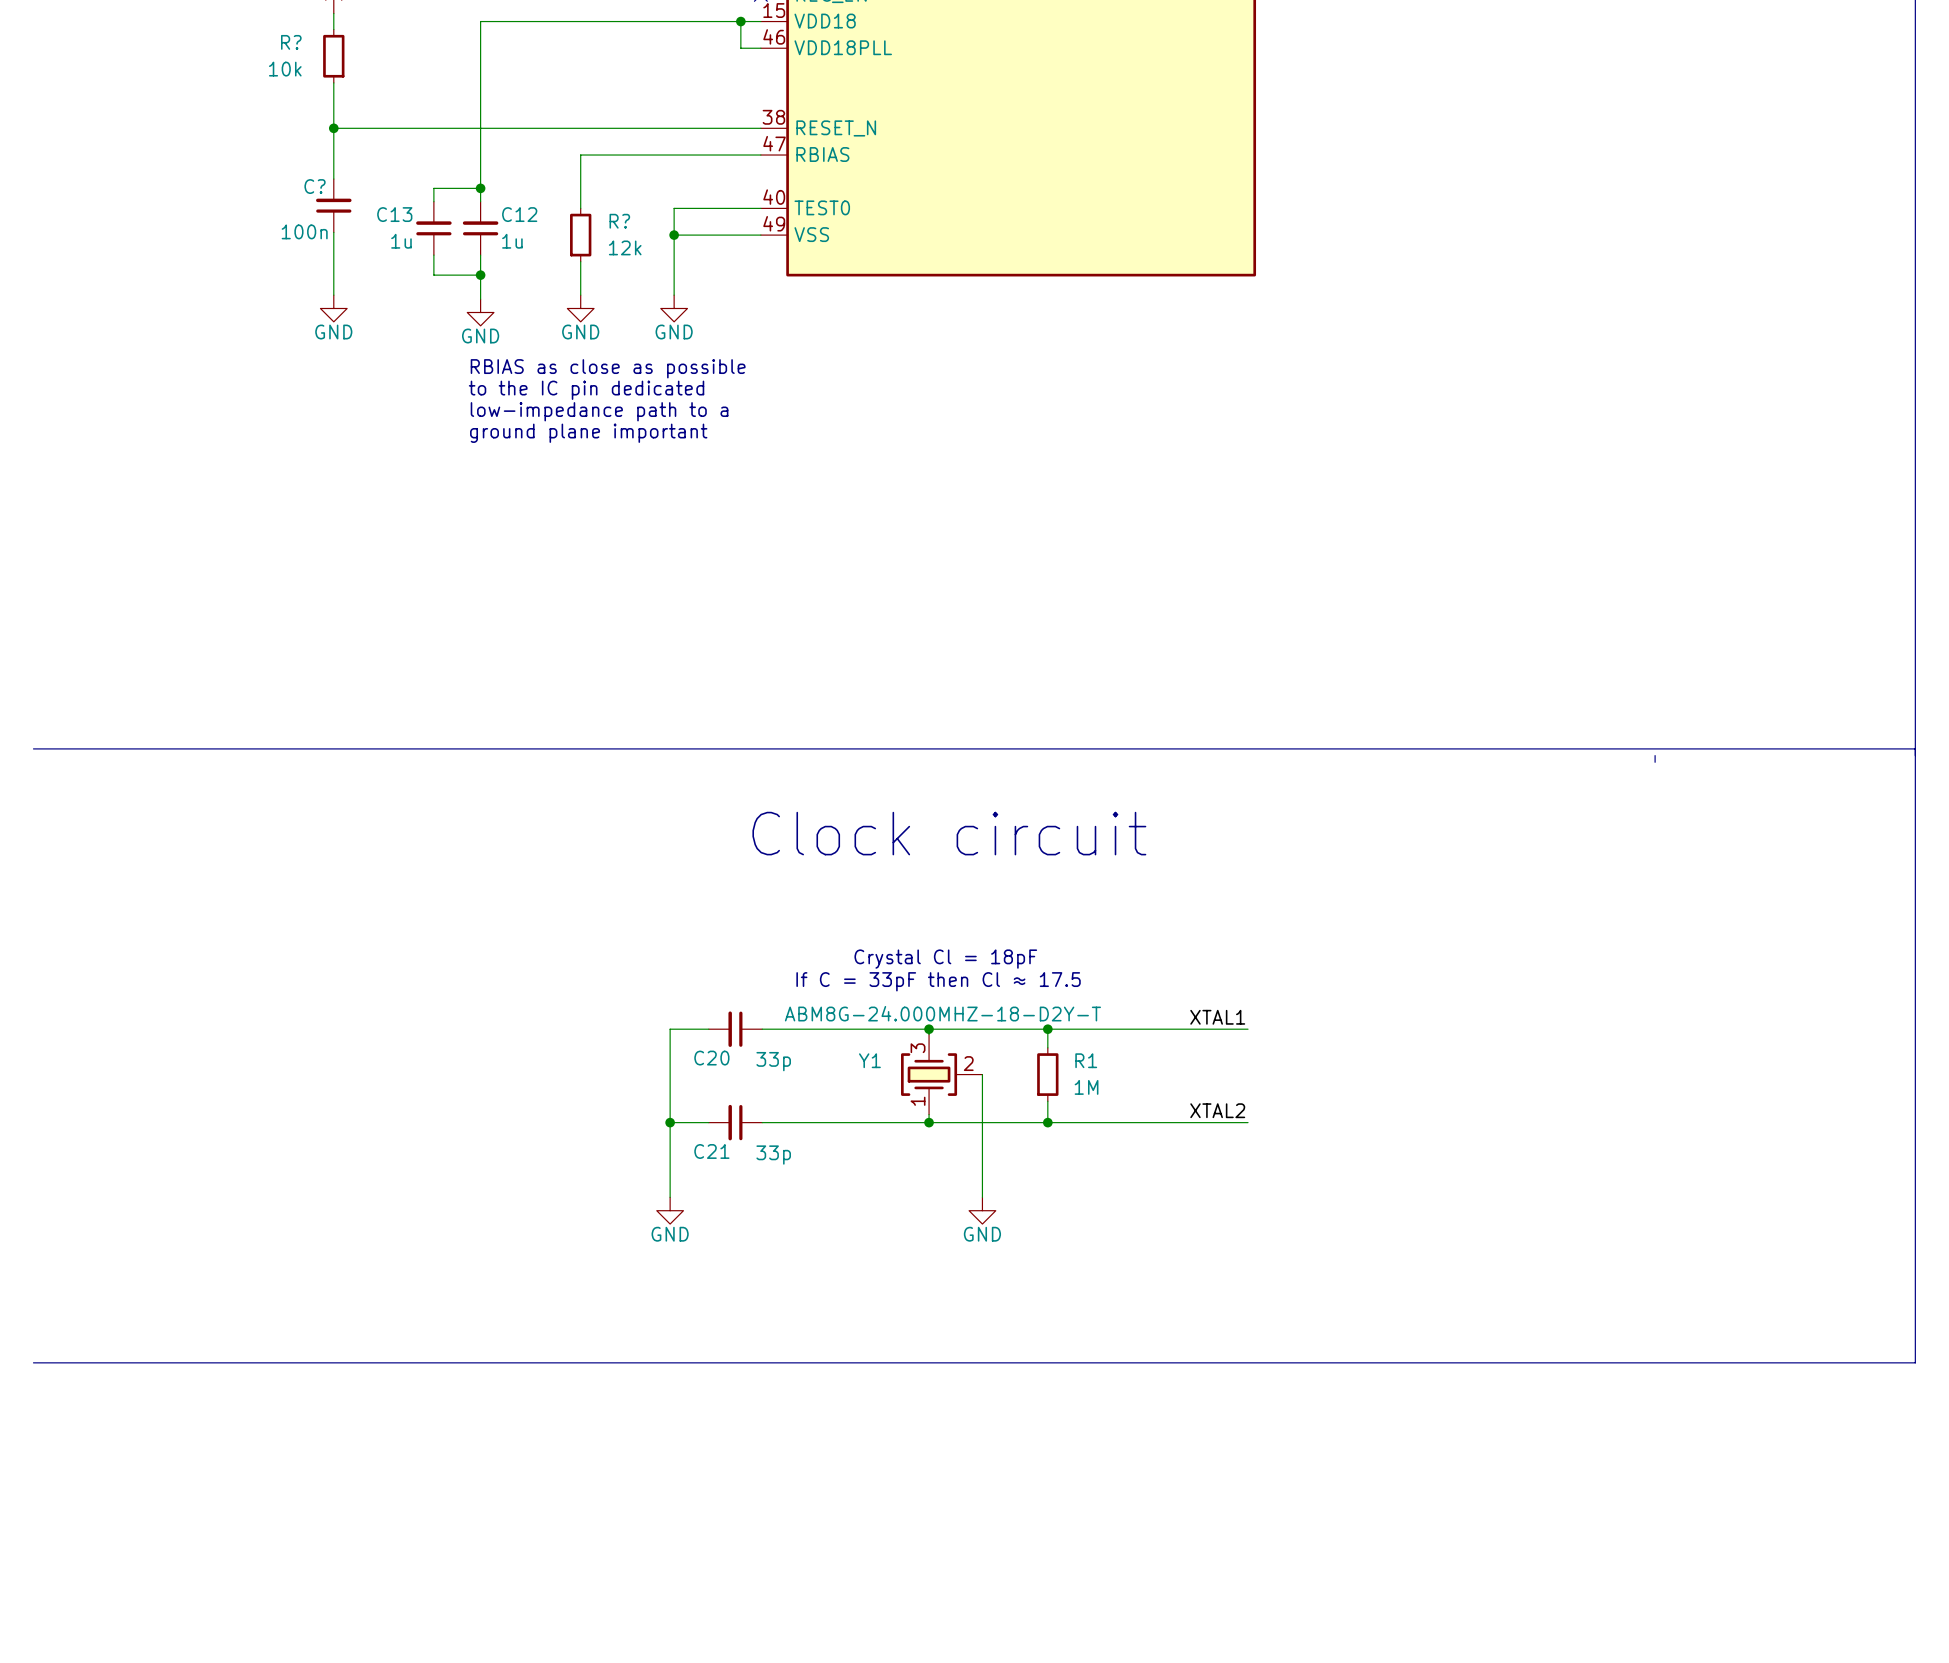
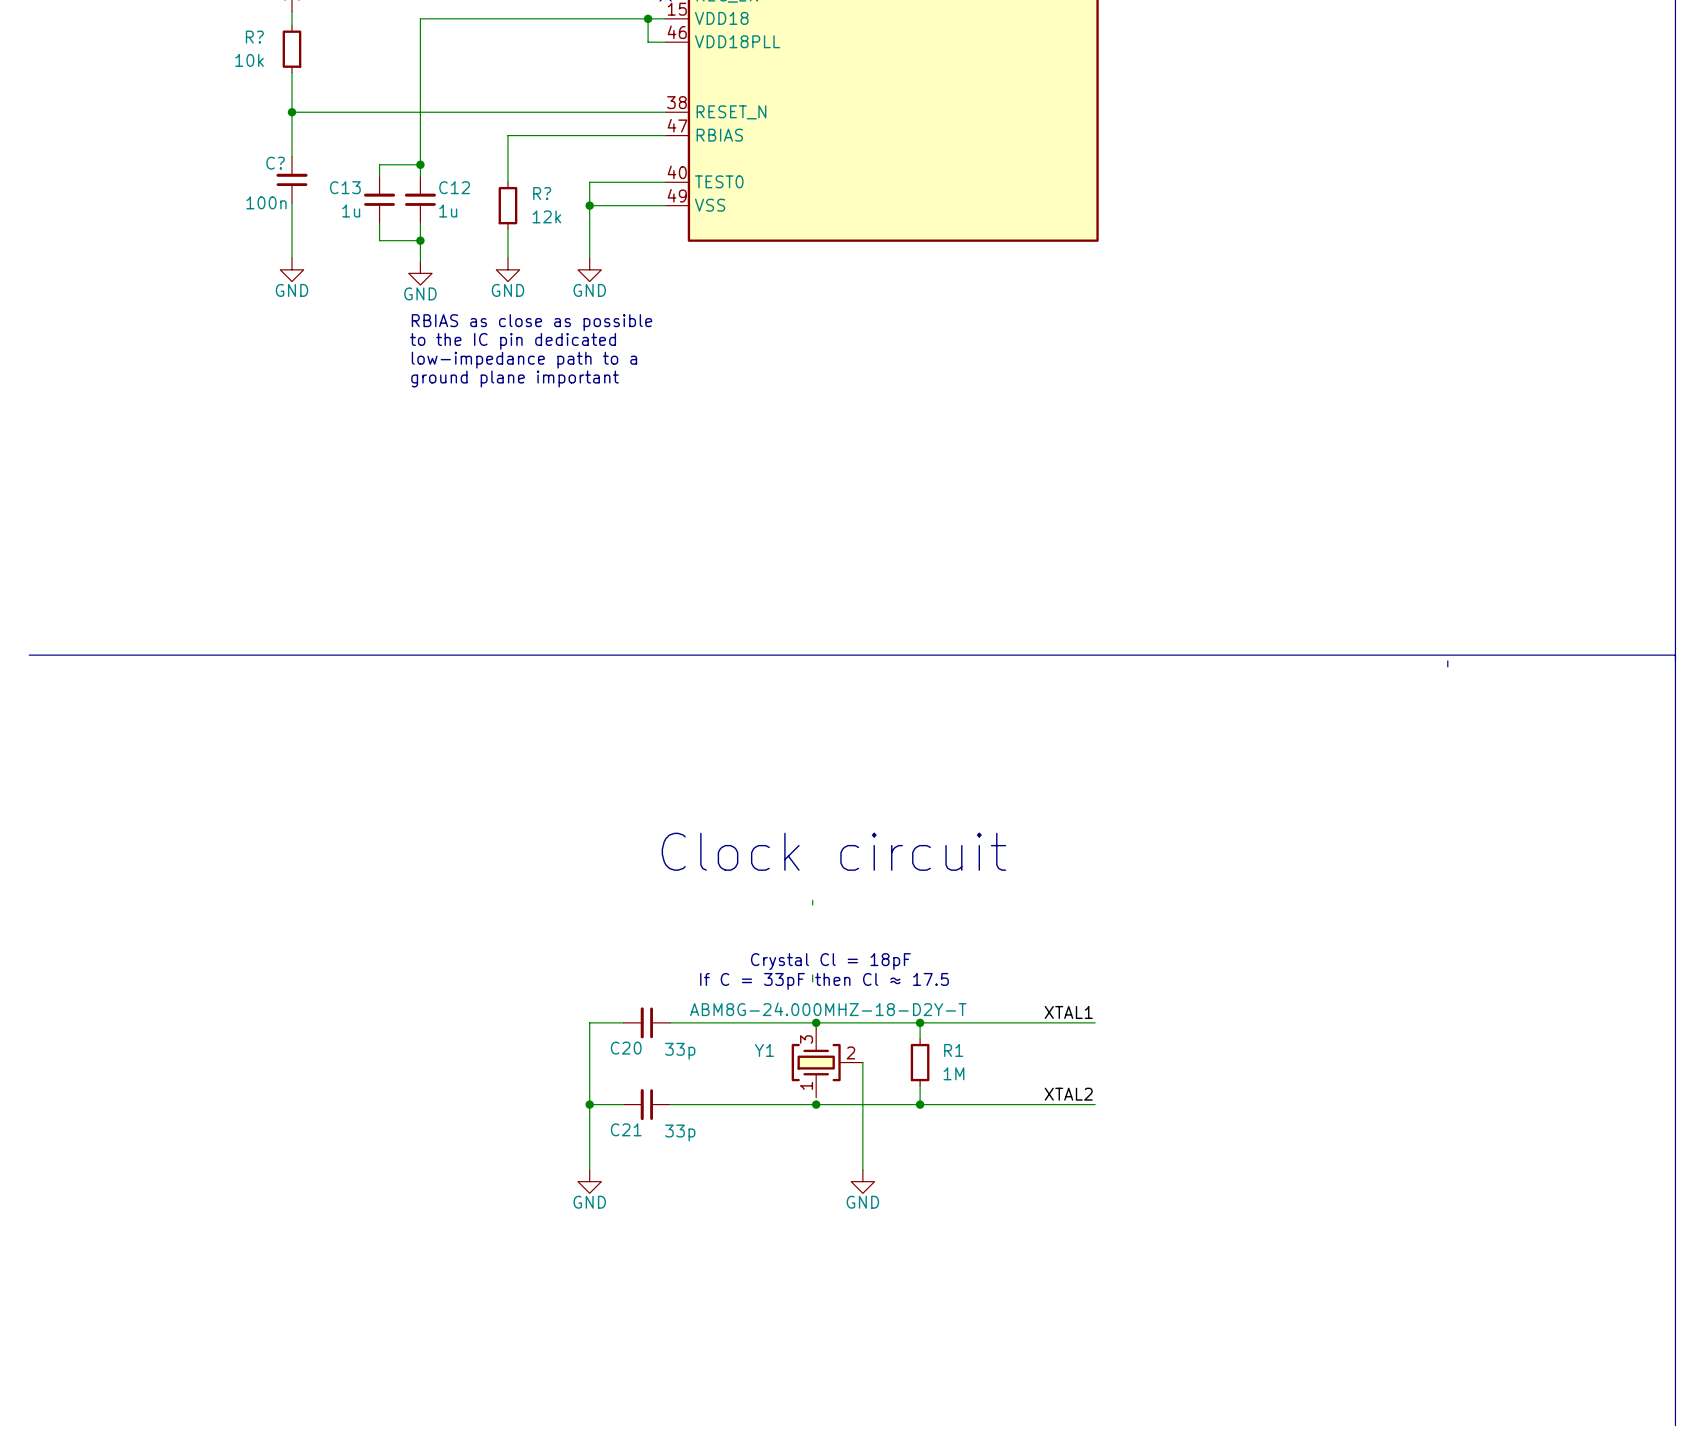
text position: Clock circuit (949, 833) -> Clock circuit (833, 851)
text position: Crystal Cl = 18pF (945, 959) -> Crystal Cl = 18pF (830, 961)
text position: If C = 33pF then Cl ≈ 17.5 (938, 981) -> If C = 33pF then Cl ≈ 17.5 (824, 981)
label position: XTAL1 (1217, 1017) -> XTAL1 (1068, 1012)
wire: (708, 1029) (670, 1029) (670, 1197) -> (623, 1022) (589, 1022) (589, 1169)
C20 position: (735, 1029) -> (646, 1022)
wire: (762, 1029) (1248, 1029) -> (670, 1022) (1095, 1022)
junction: (929, 1029) -> none
wire: (1047, 1029) (1047, 1047) -> (920, 1022) (920, 1039)
junction: (1047, 1029) -> none
Y1 position: (941, 1074) -> (827, 1062)
wire: (982, 1074) (982, 1197) -> (862, 1062) (862, 1169)
R1 position: (1047, 1074) -> (920, 1062)
wire: (1047, 1101) (1047, 1122) -> (920, 1085) (920, 1104)
label position: XTAL2 (1217, 1110) -> XTAL2 (1068, 1094)
wire: (670, 1122) (708, 1122) -> (589, 1104) (623, 1104)
junction: (670, 1122) -> none
C21 position: (735, 1122) -> (646, 1104)
wire: (762, 1122) (1248, 1122) -> (670, 1104) (1095, 1104)
junction position: (929, 1122) -> (816, 1022)
junction position: (1047, 1122) -> (920, 1022)
power symbol position: GND (670, 1210) -> GND (589, 1181)
power symbol position: GND (982, 1210) -> GND (862, 1181)
junction: none -> (589, 1104)
junction: none -> (816, 1104)
junction: none -> (920, 1104)
line: (33, 1362) (1915, 1362) -> (1675, 1425) (1675, 1192)

